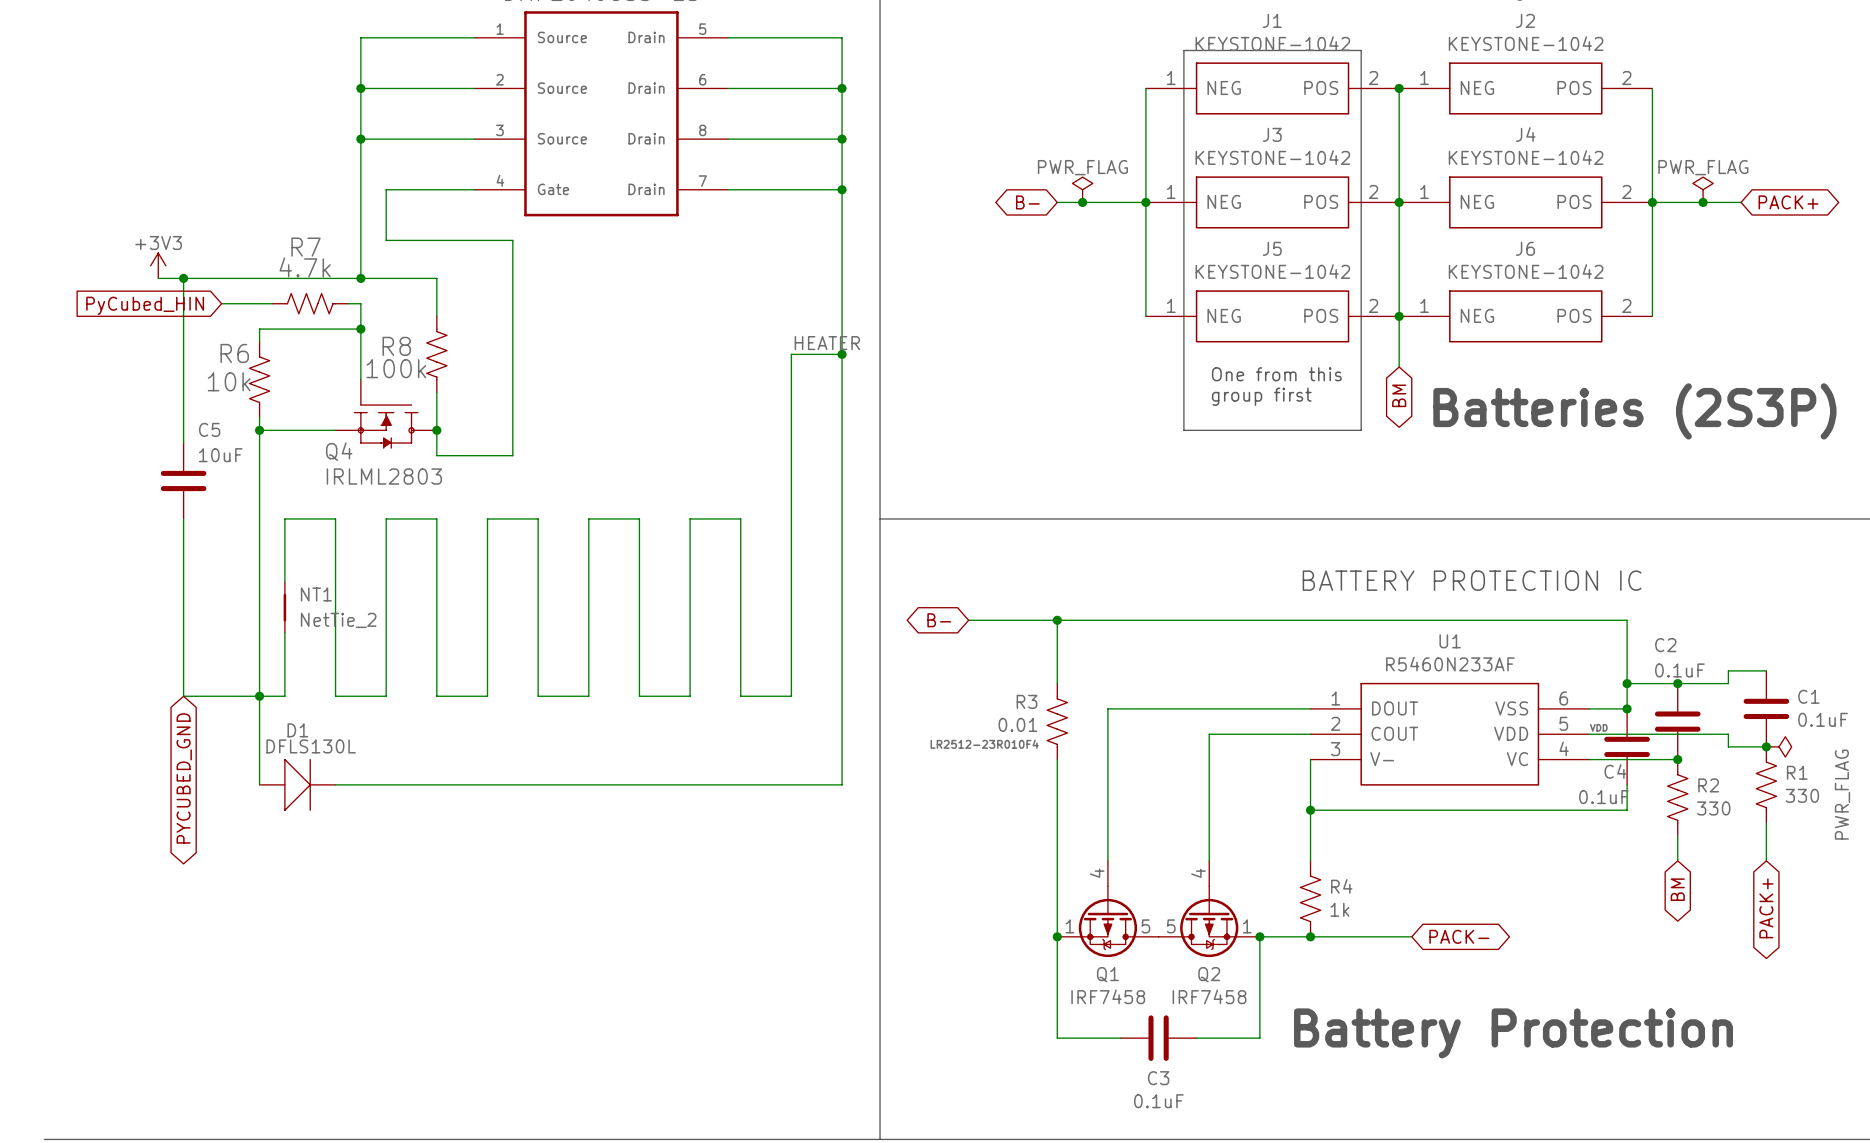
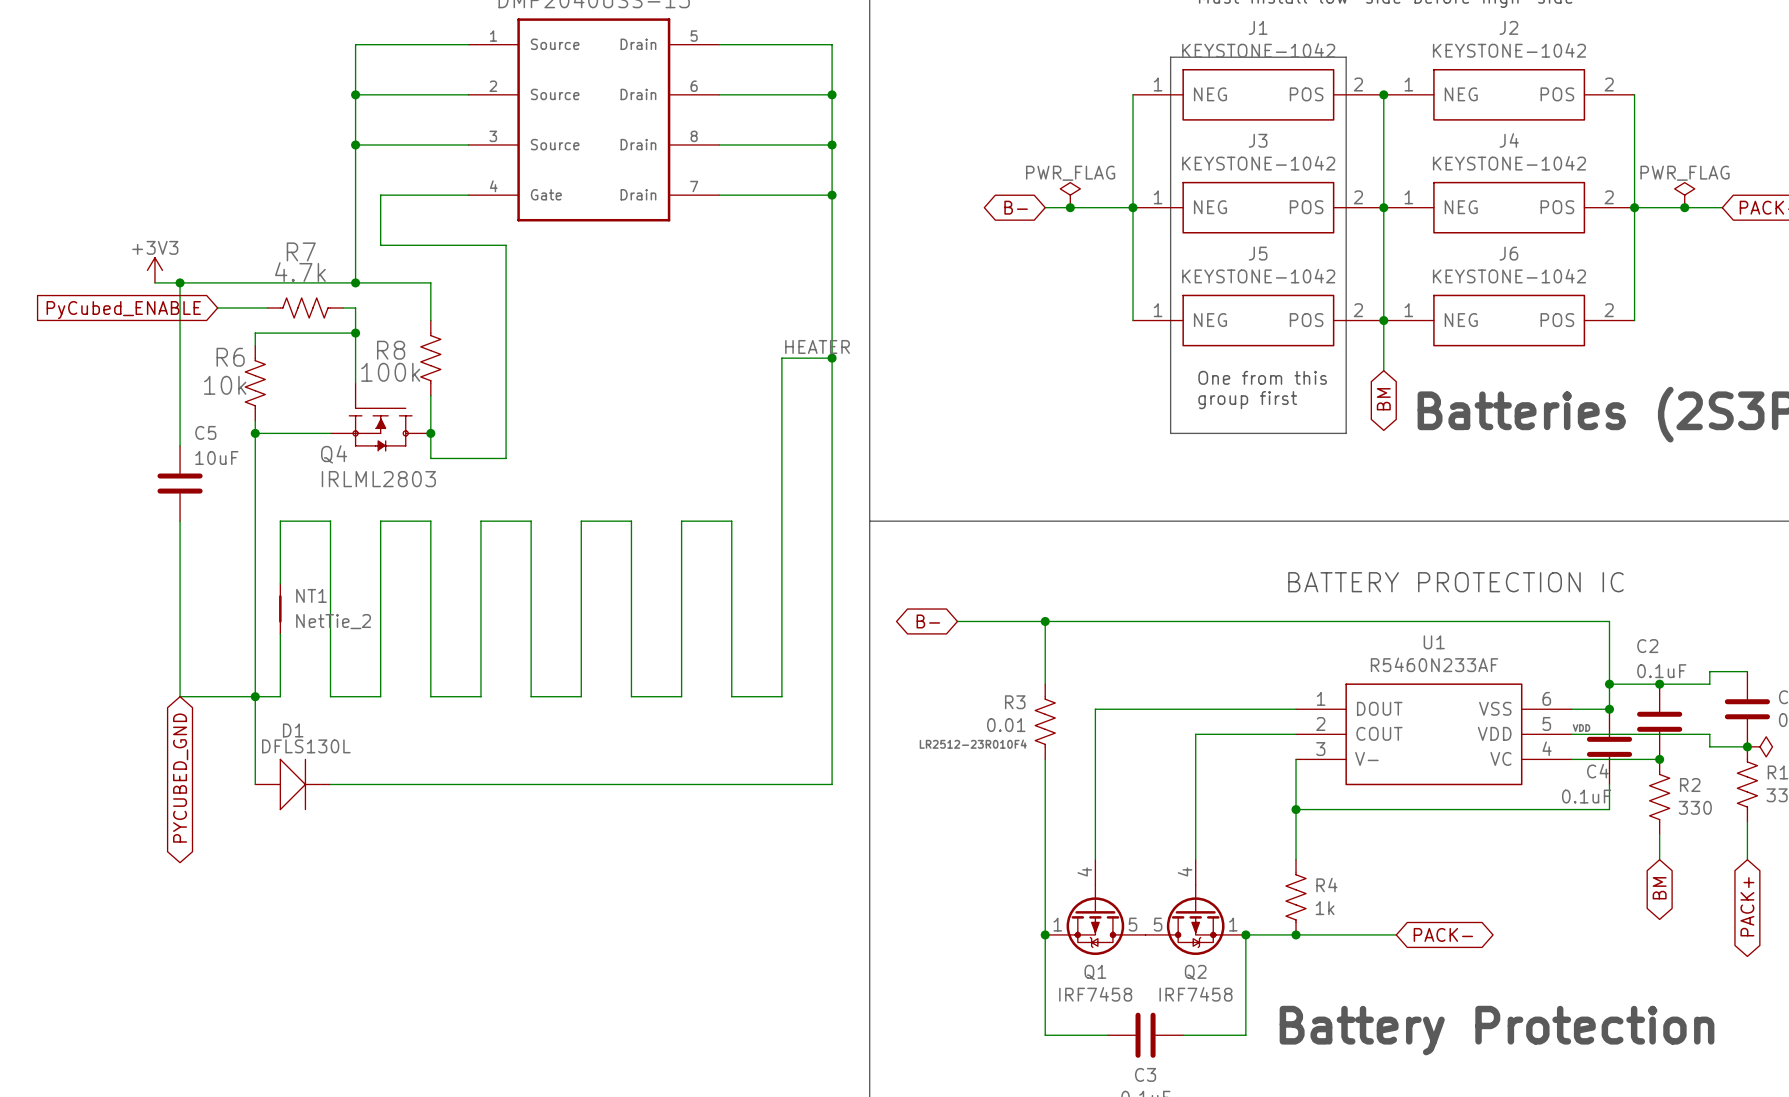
global label: PyCubed_HIN (145, 305) -> PyCubed_ENABLE (123, 310)

